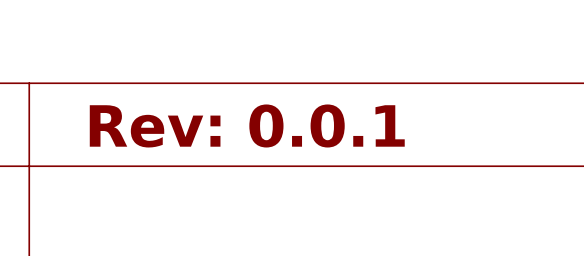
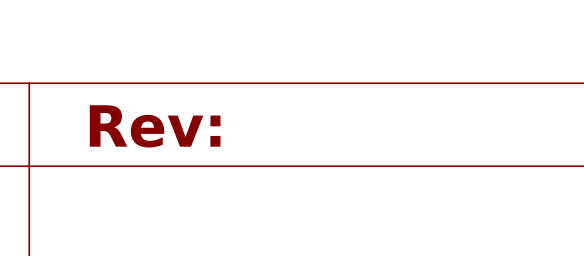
title block: Rev: 0.0.1 (247, 125) -> Rev: (155, 126)

